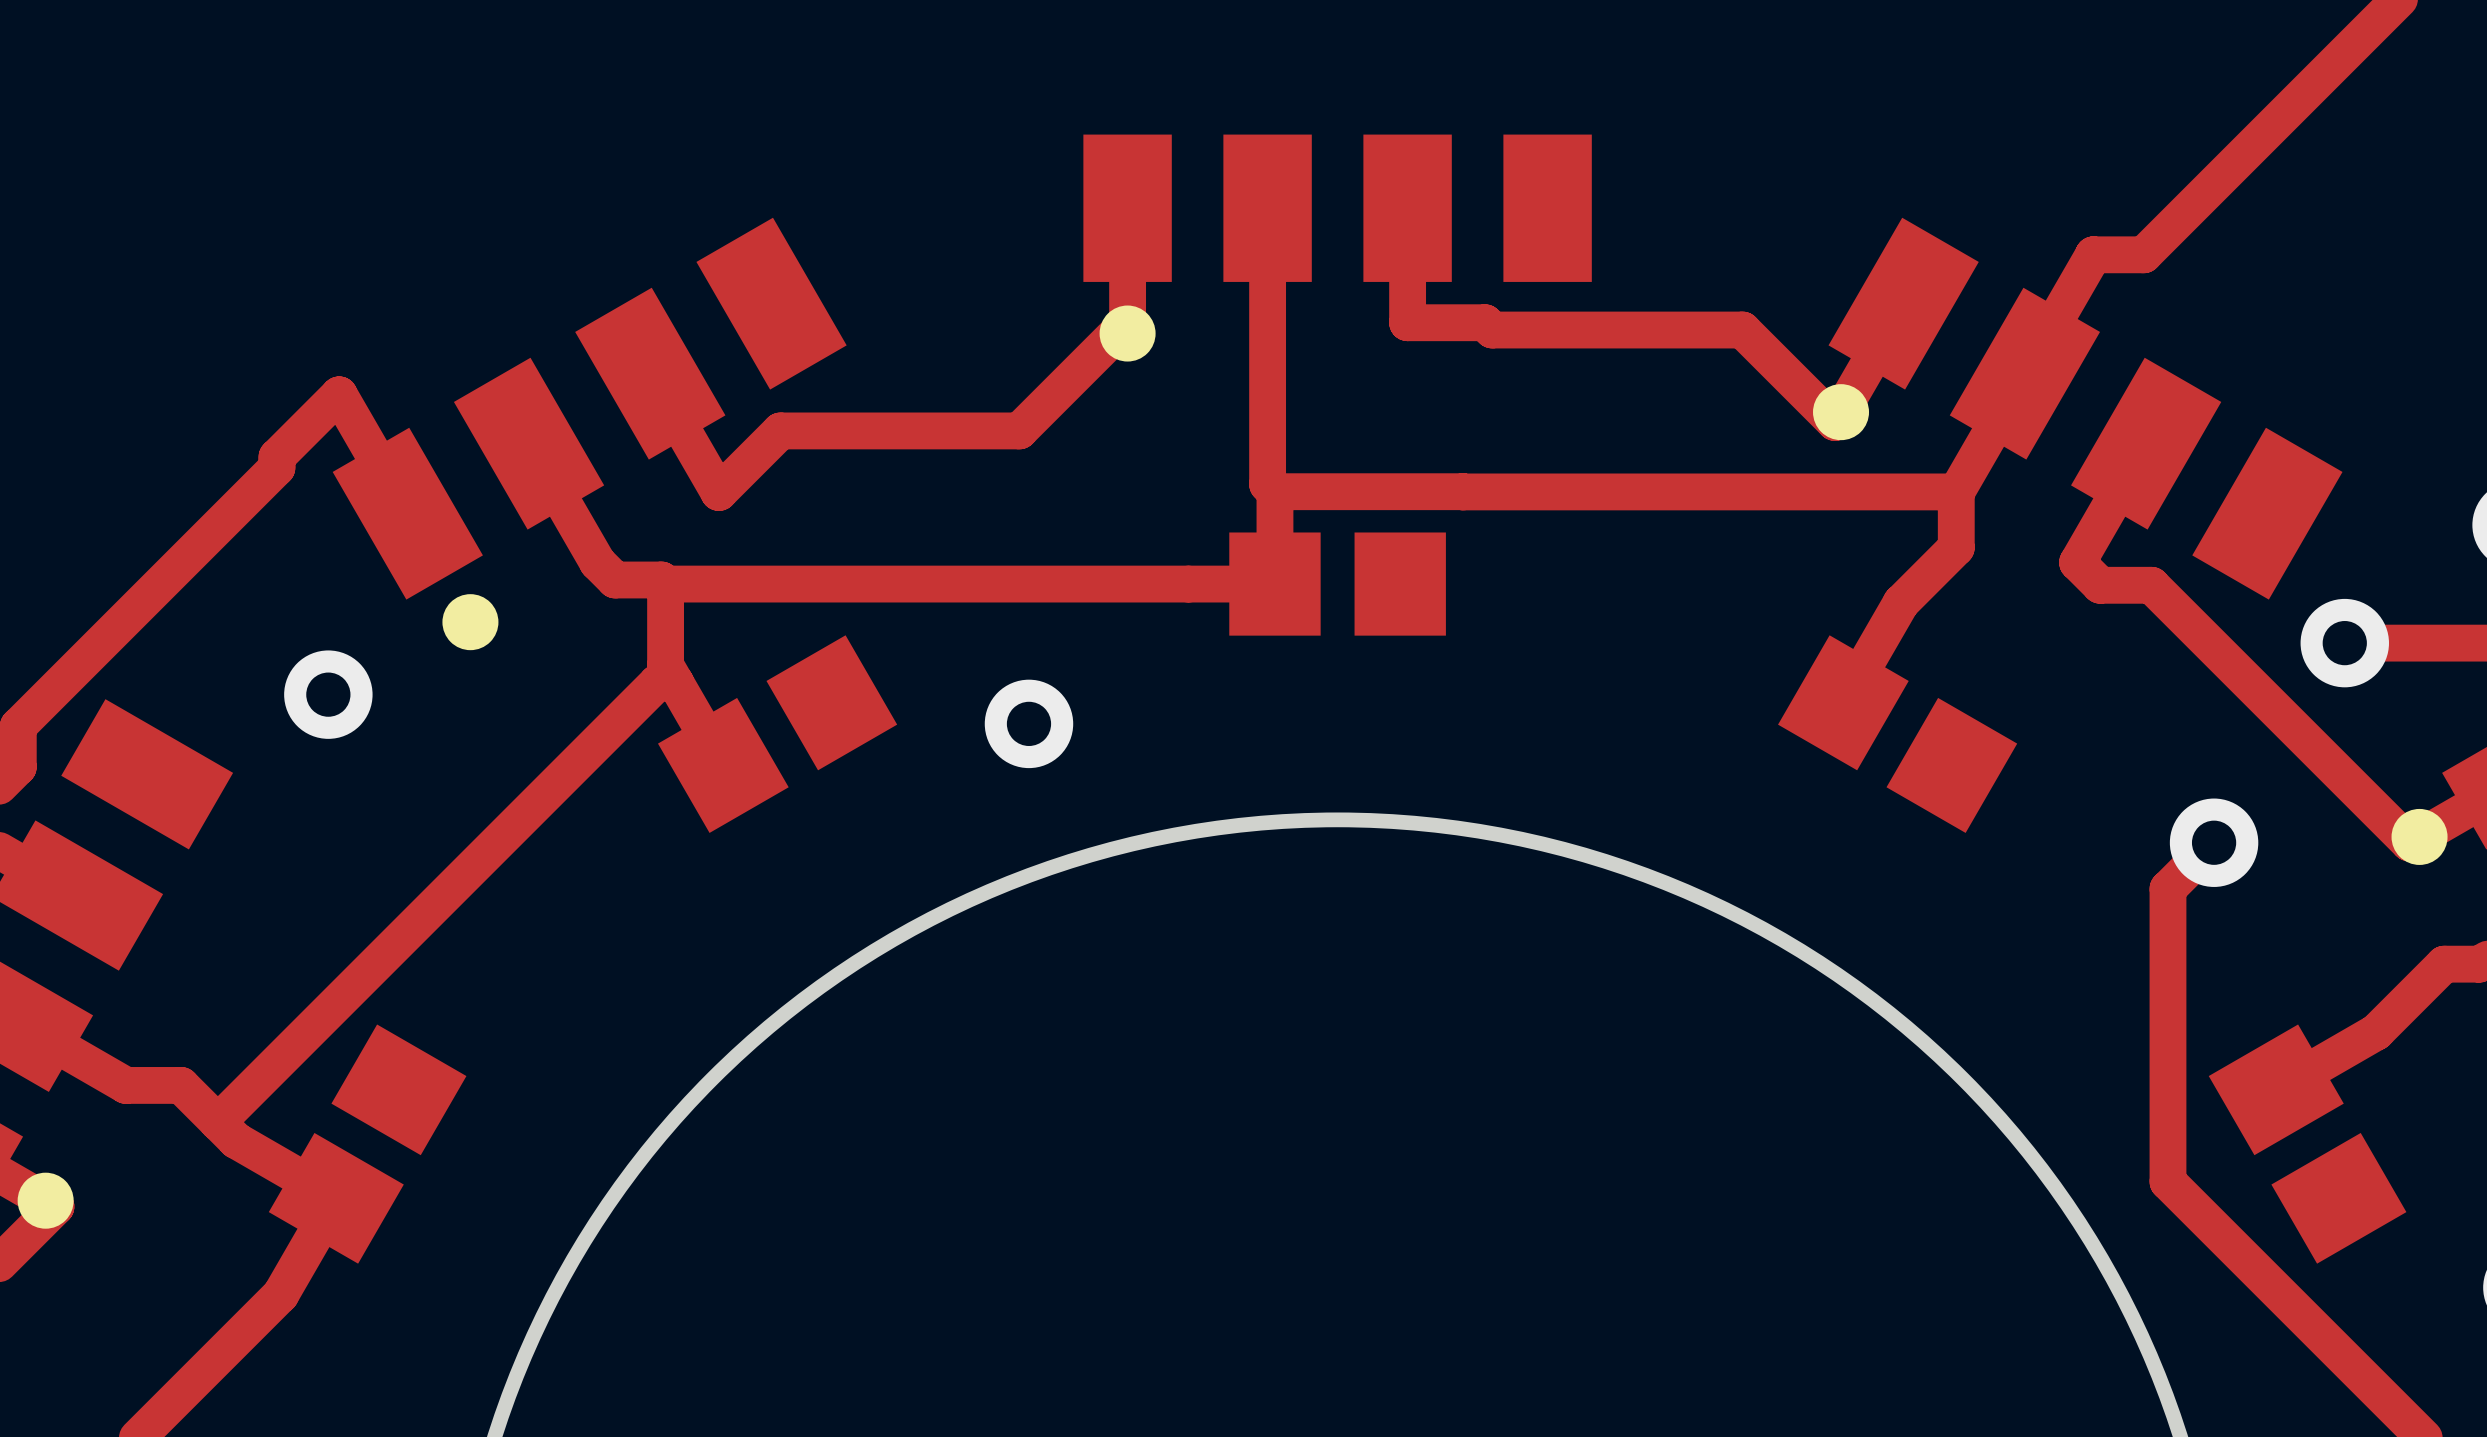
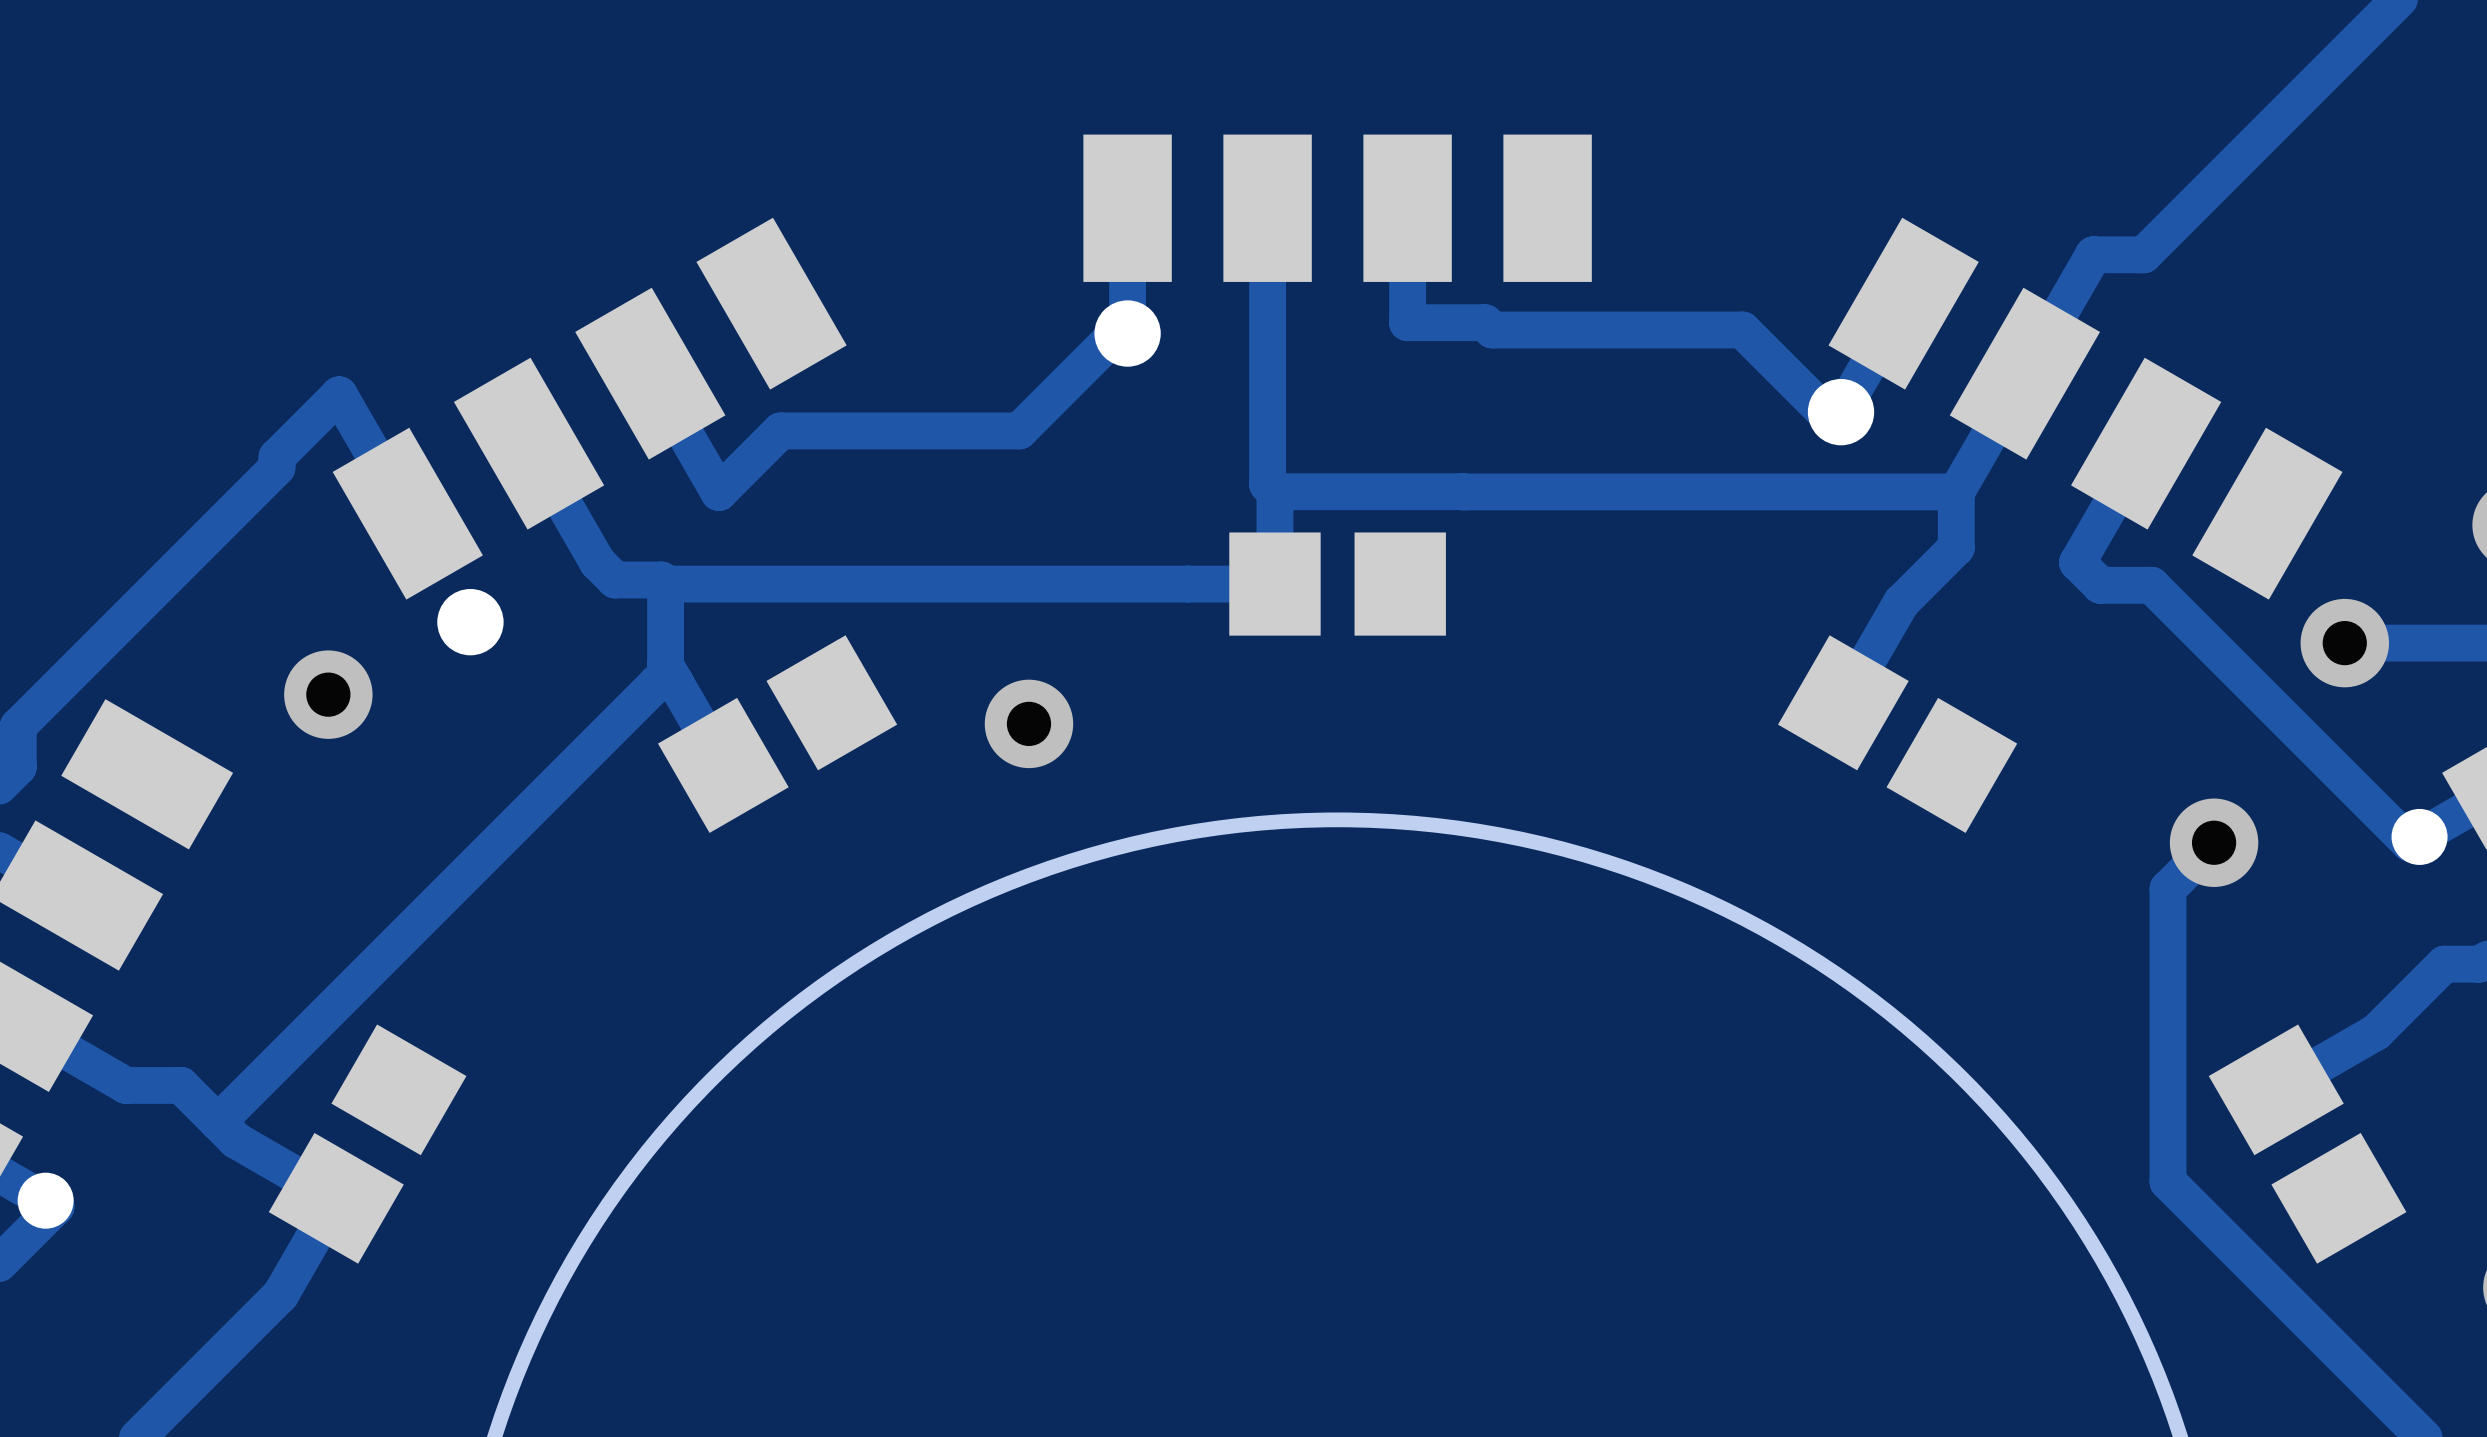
part footprint: [1083, 134, 1592, 362] -> [1083, 134, 1592, 367]
part footprint: [332, 217, 847, 651] -> [332, 217, 847, 656]
part footprint: [1813, 217, 2343, 600] -> [1807, 217, 2343, 600]

